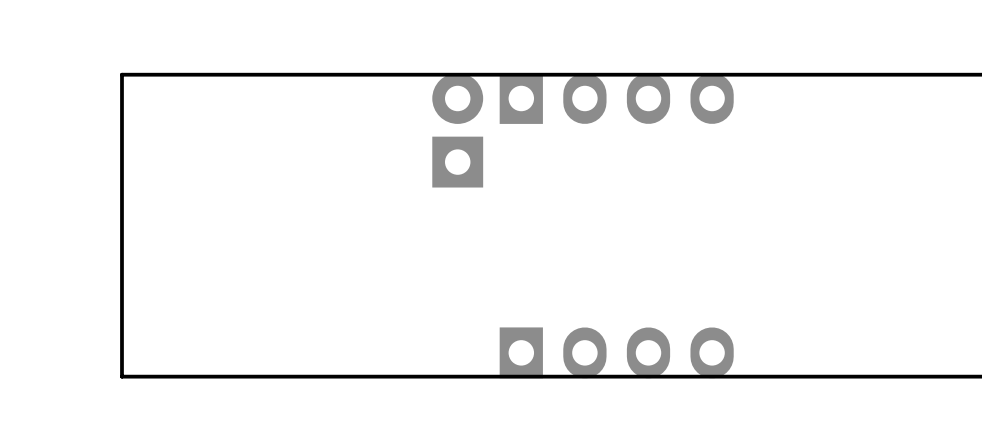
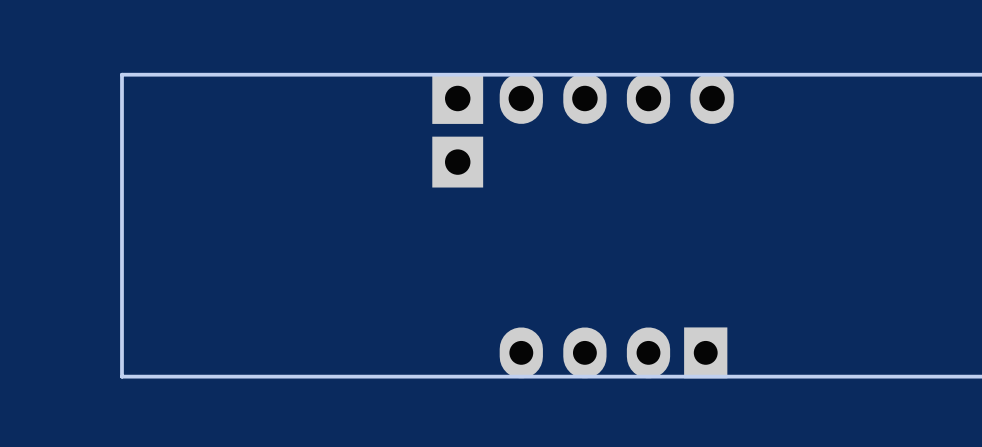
part footprint: [432, 73, 484, 188] -> [432, 73, 484, 188]
part footprint: [499, 73, 734, 124] -> [499, 73, 734, 124]
part footprint: [499, 327, 734, 379] -> [499, 327, 728, 379]

